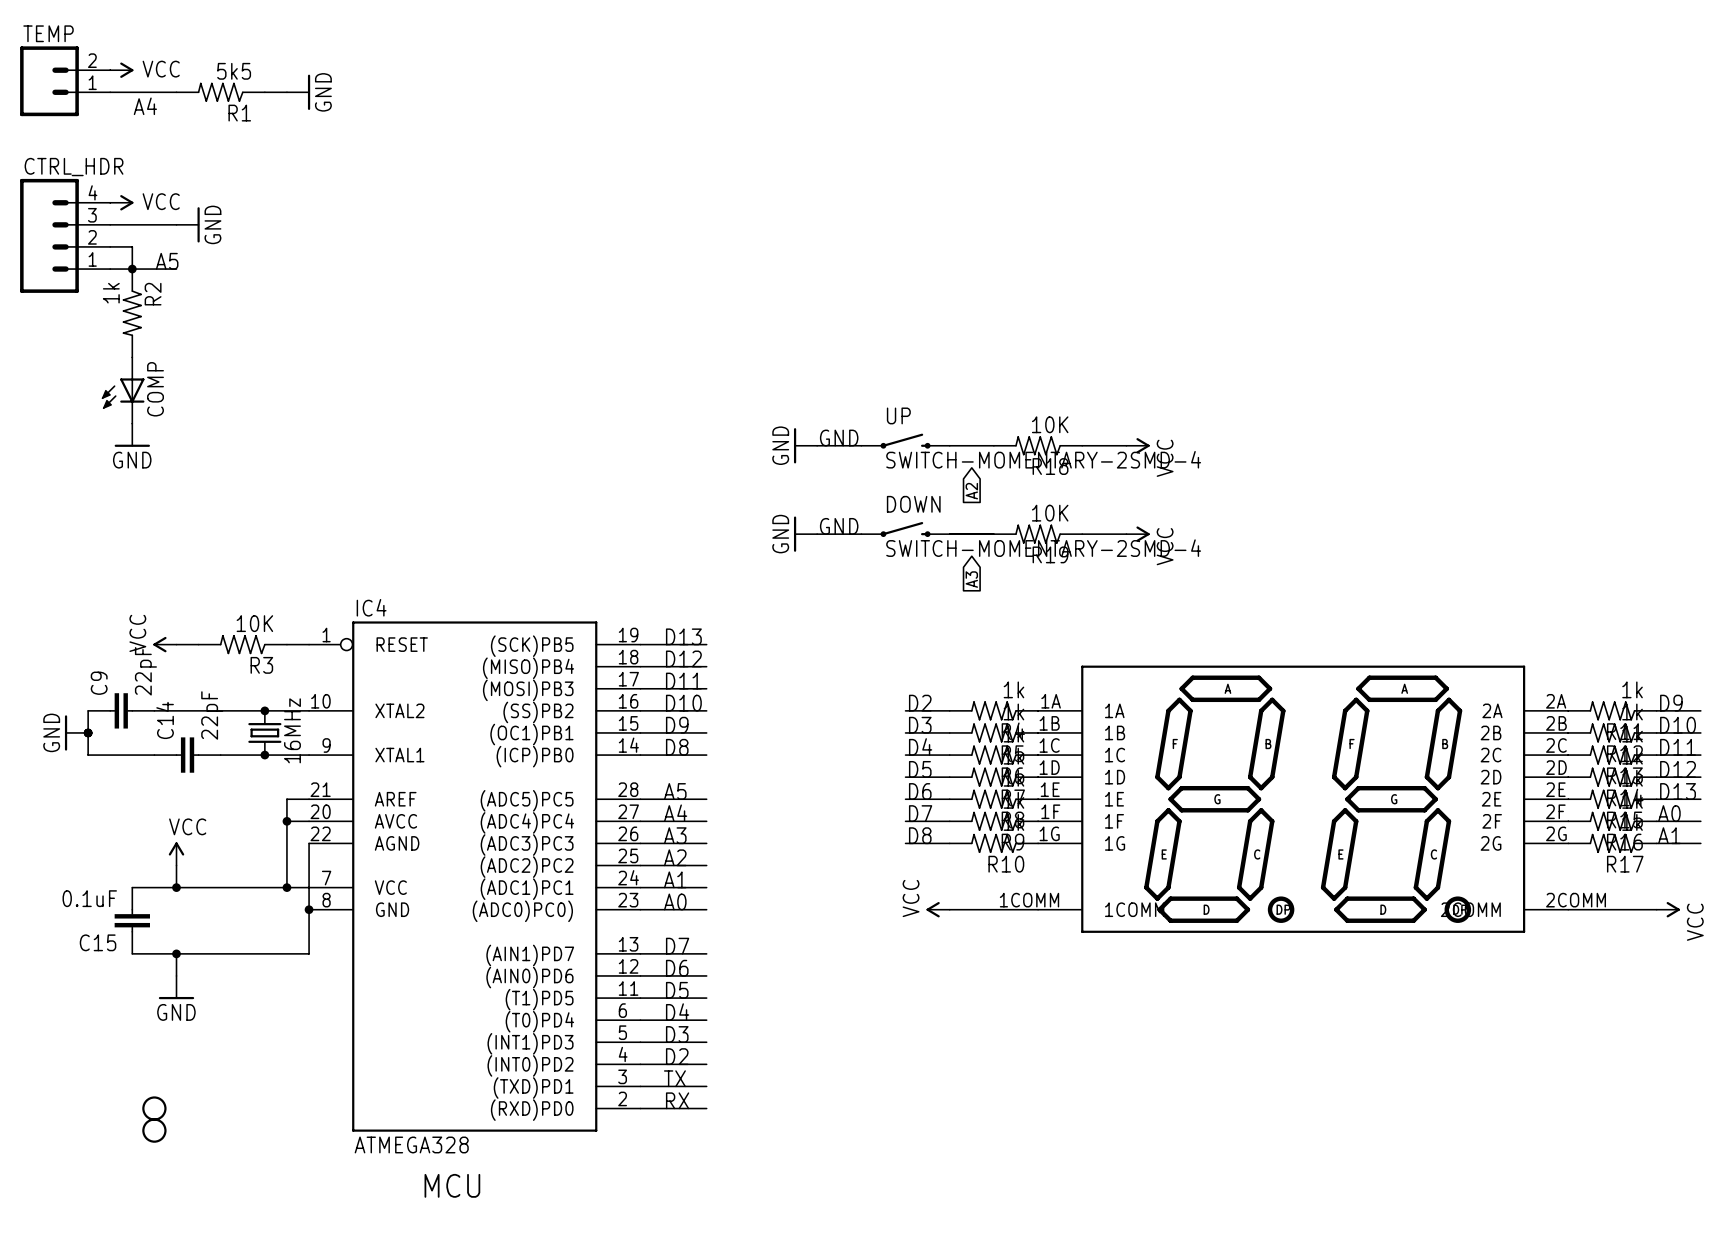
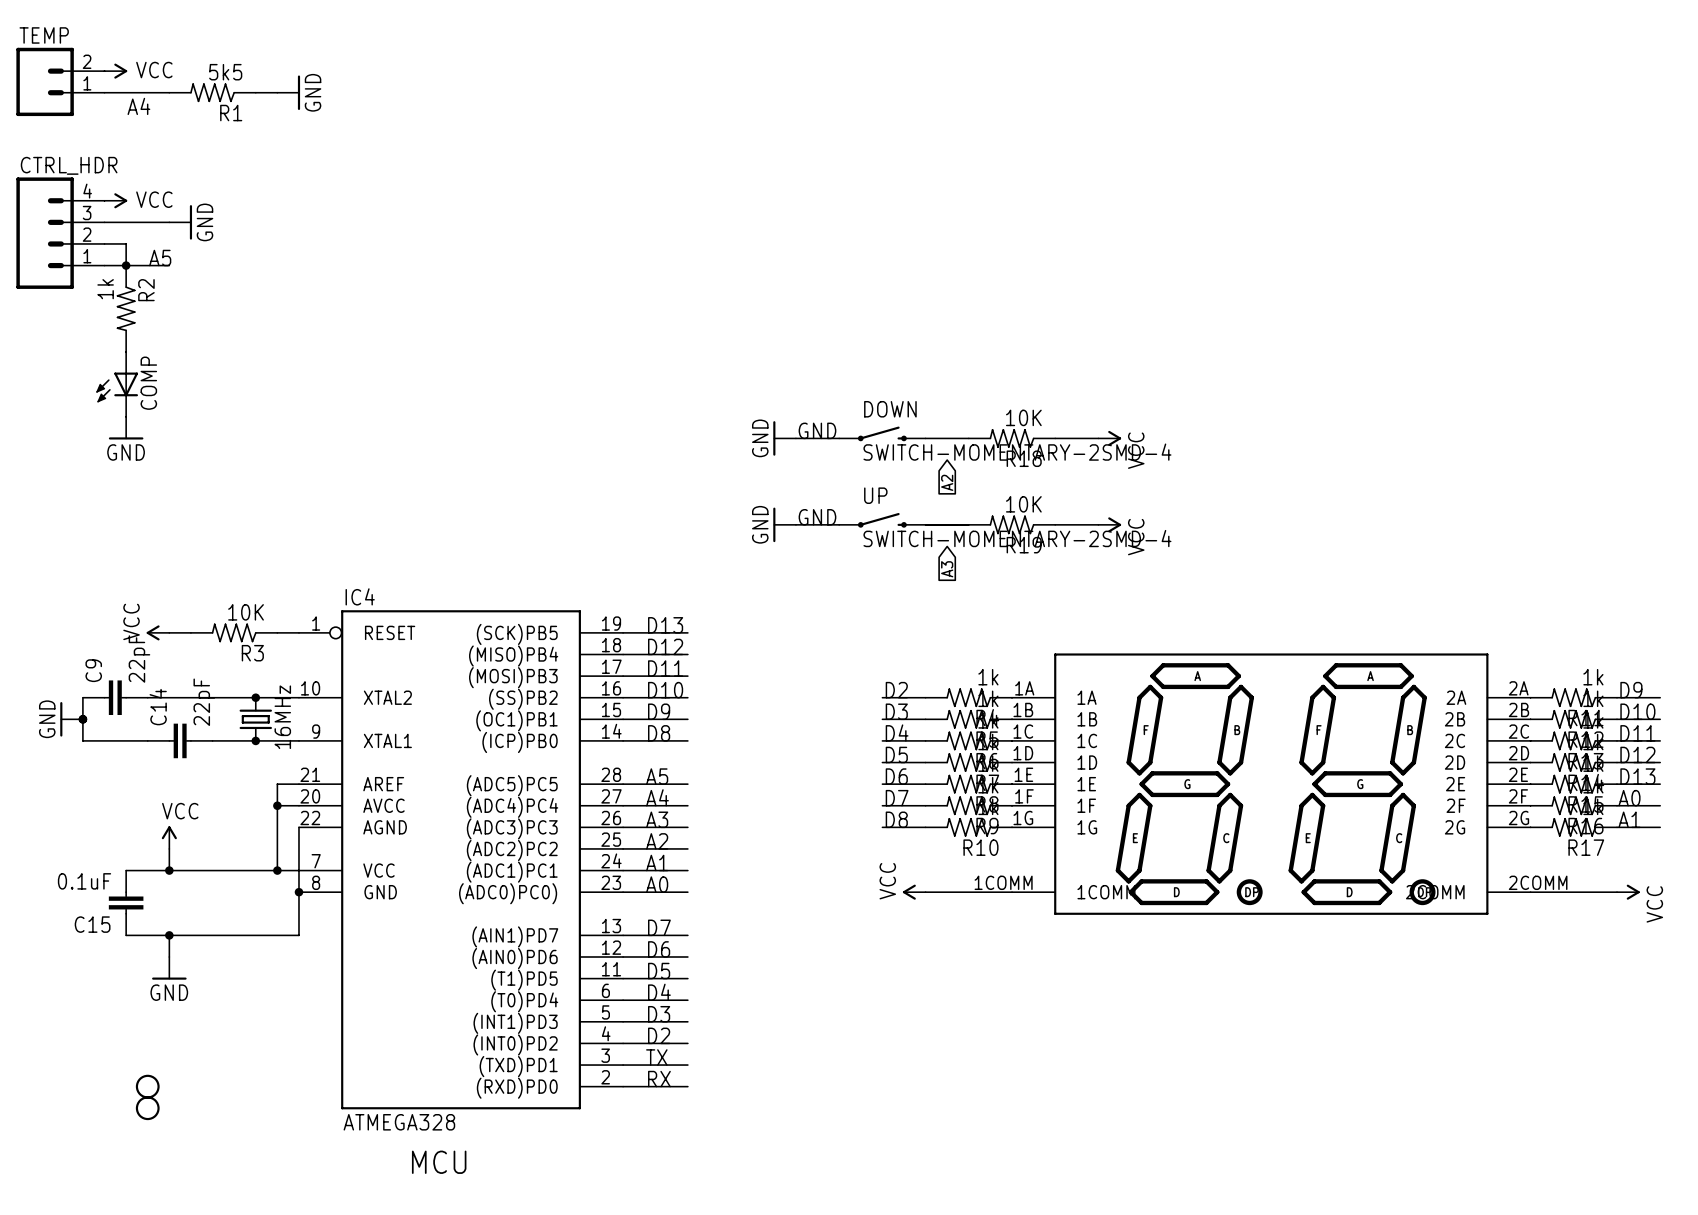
UP name: UP (898, 415) -> DOWN (890, 409)
DOWN name: DOWN (913, 504) -> UP (875, 495)

